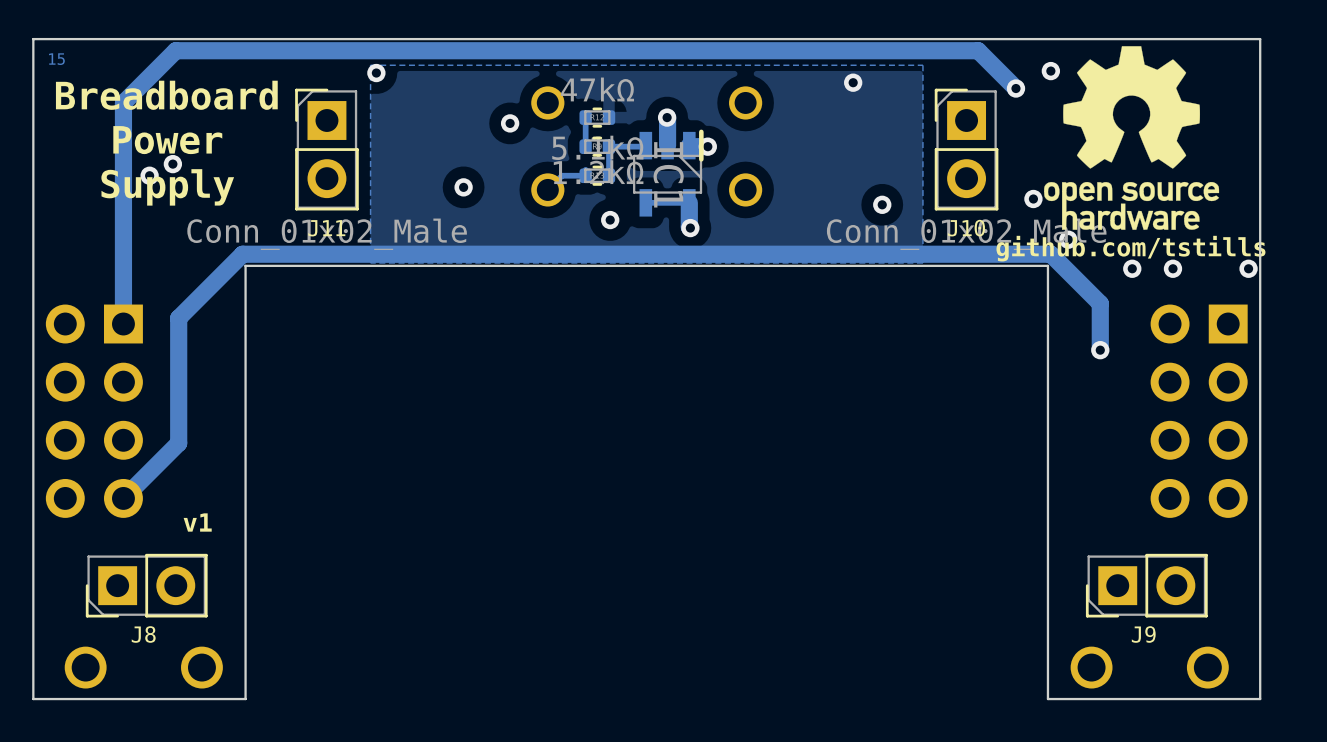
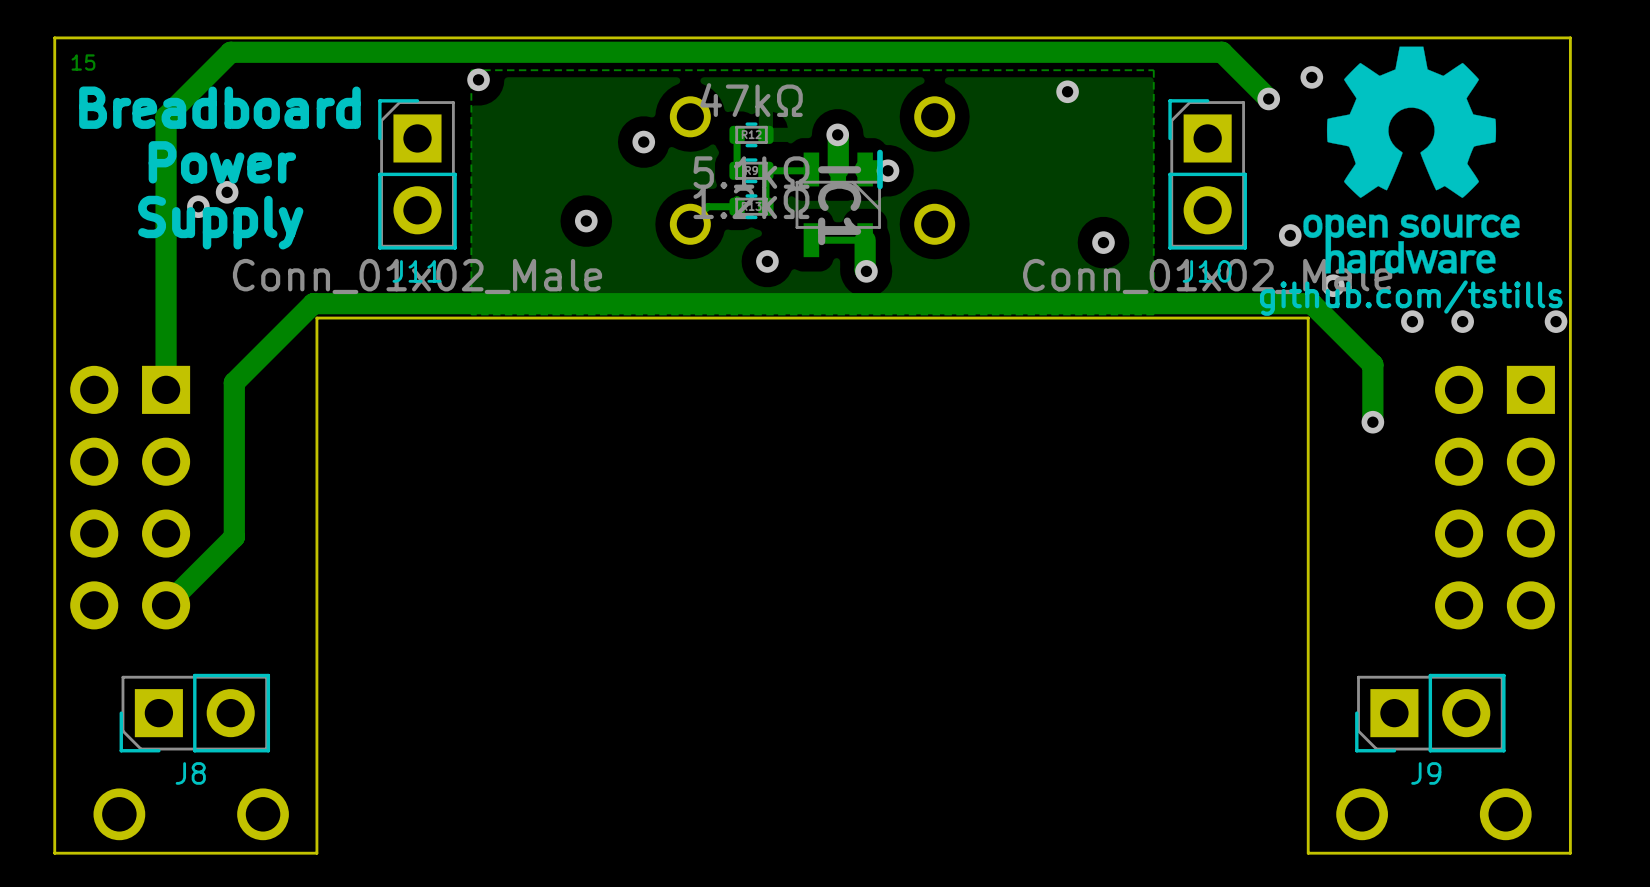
text: v1 (197, 522) -> none

